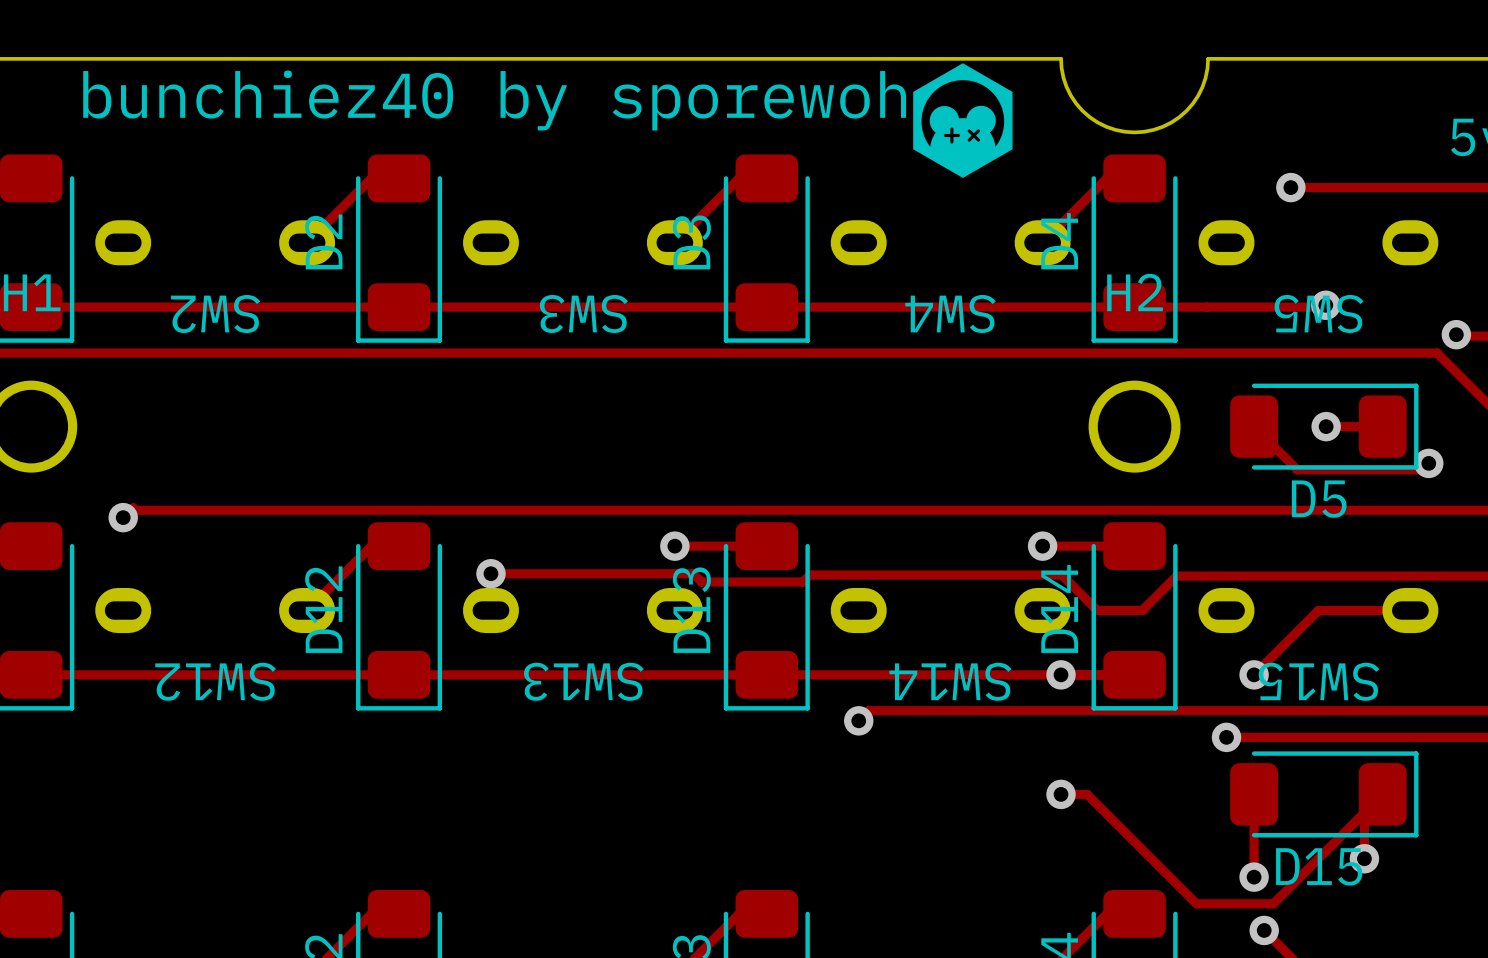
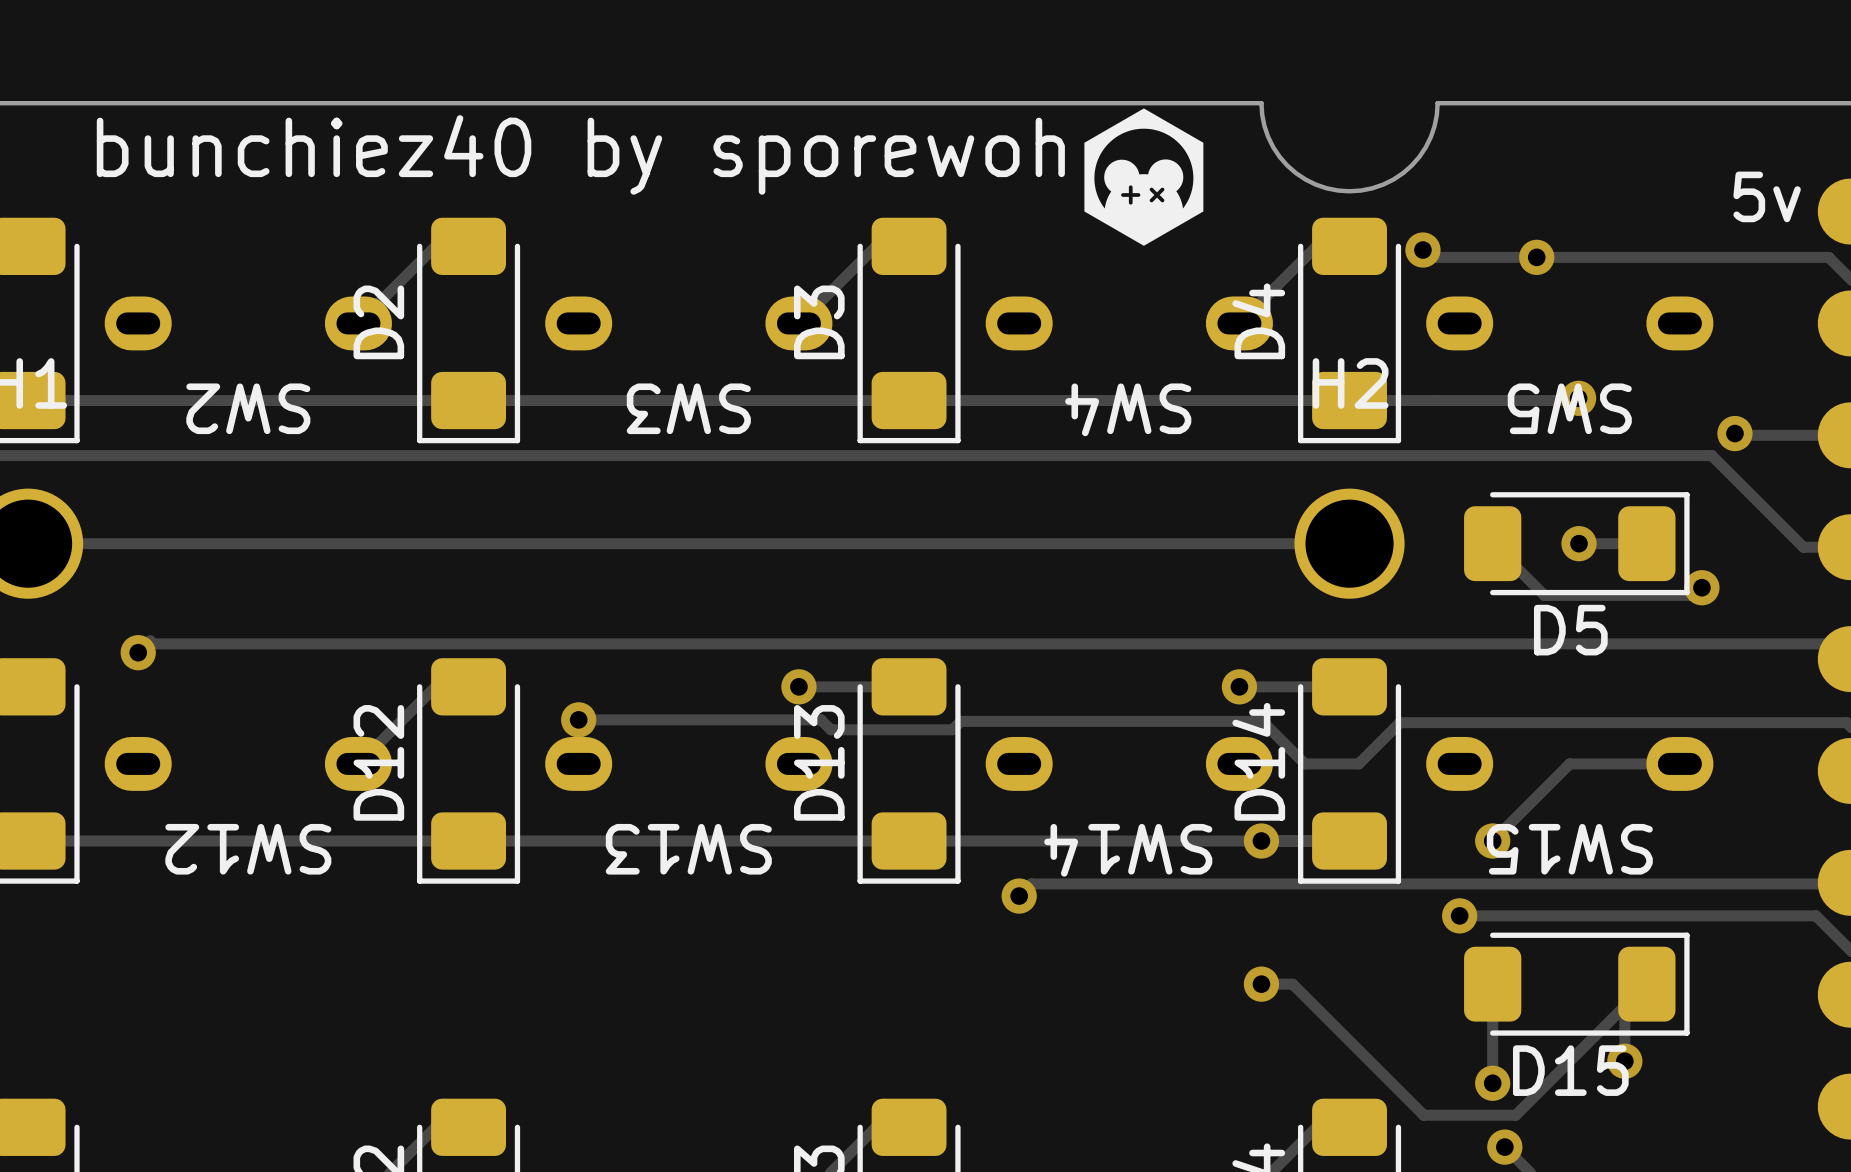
track: none -> (1422, 250) (1430, 257) (1536, 257)
via: none -> (1422, 250)
track: none -> (28, 543) (1349, 543)

